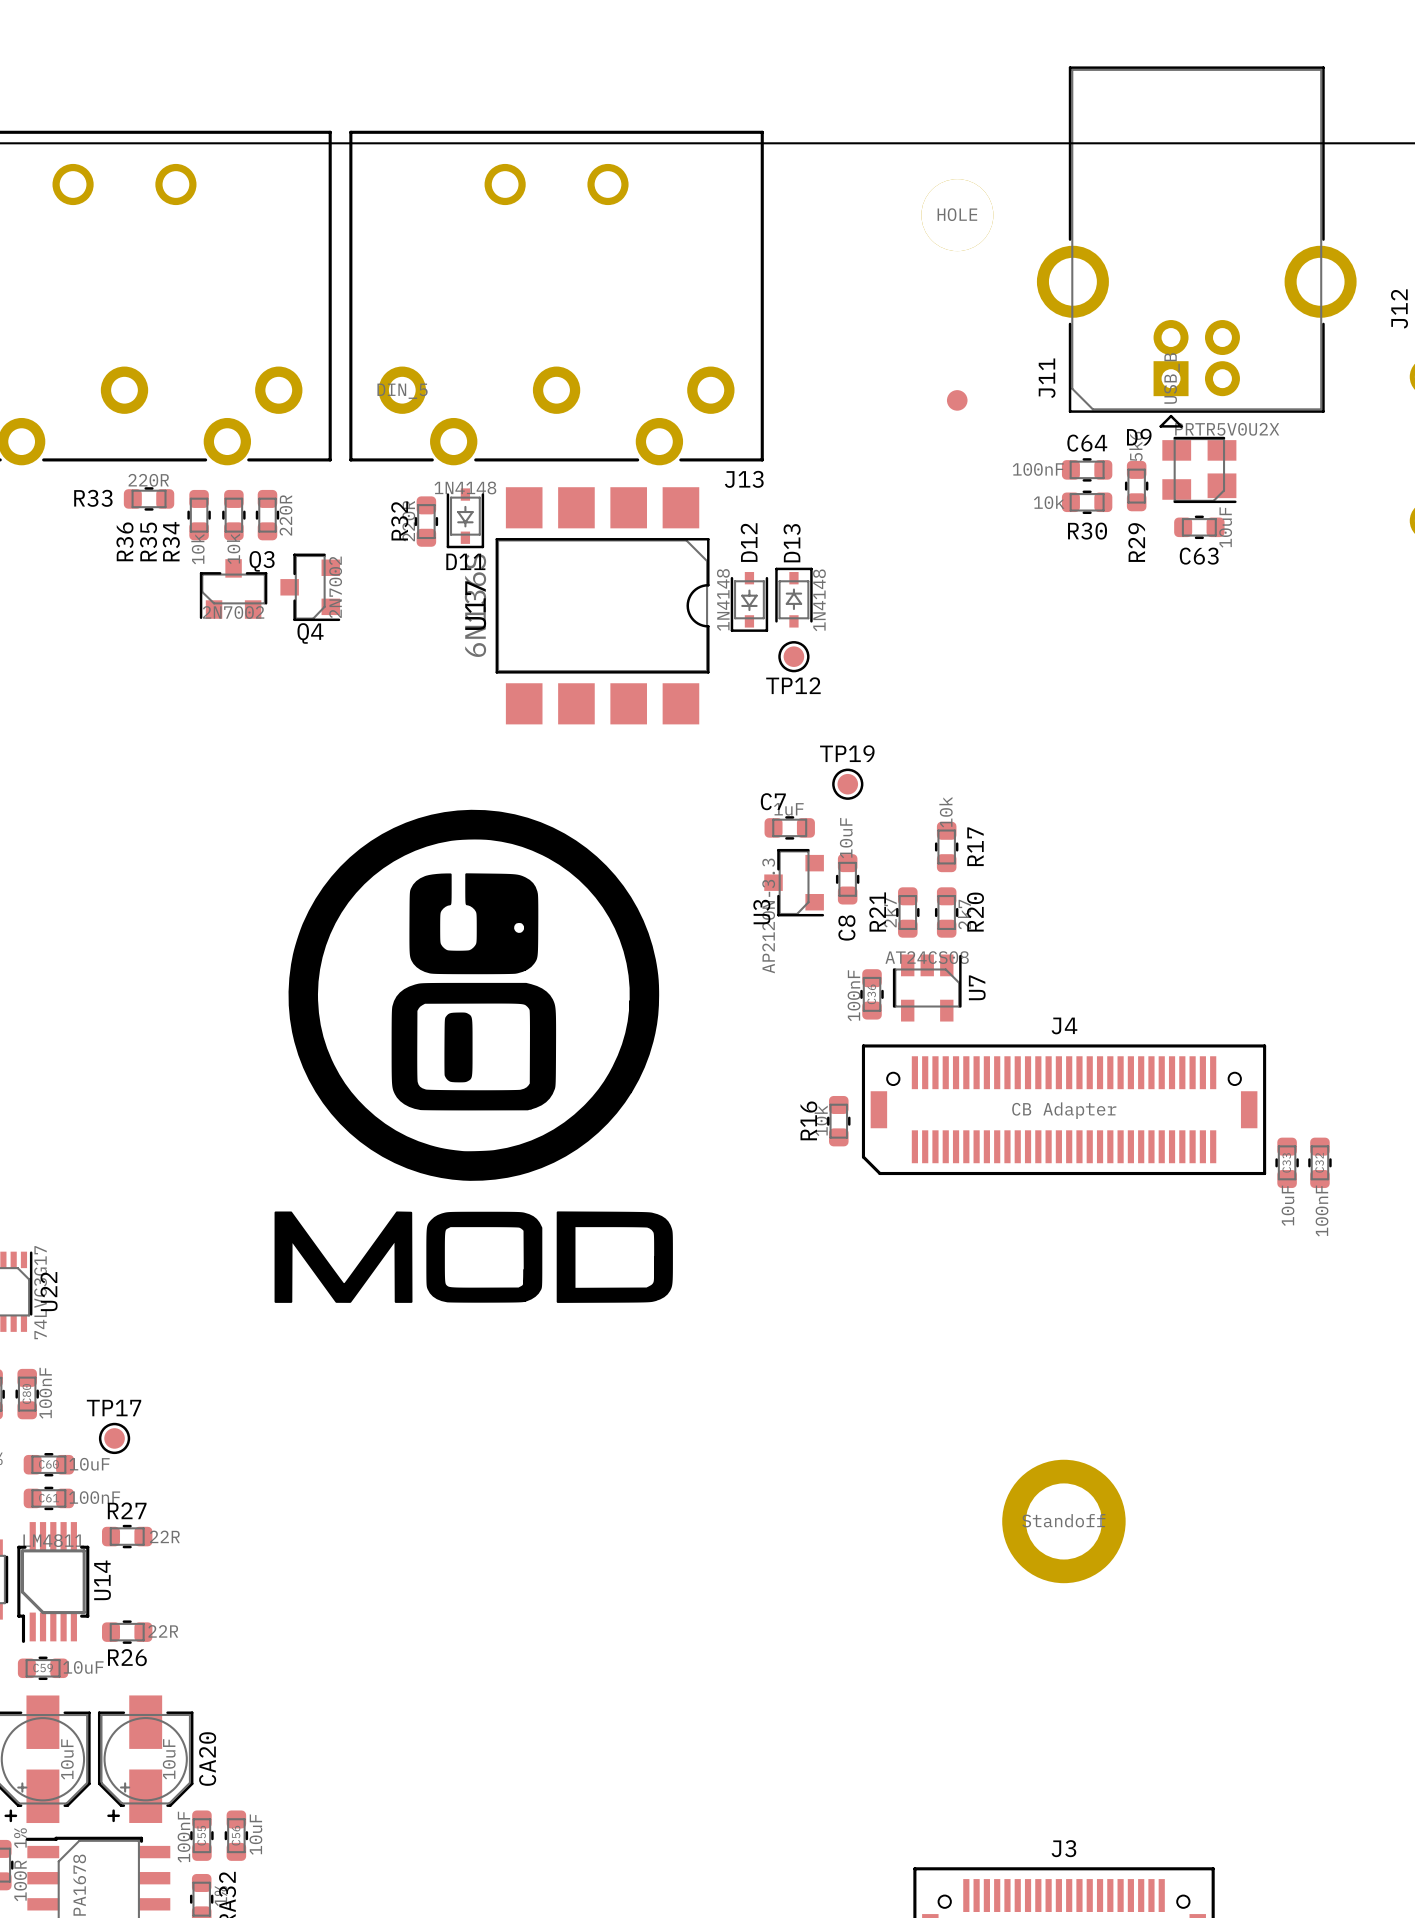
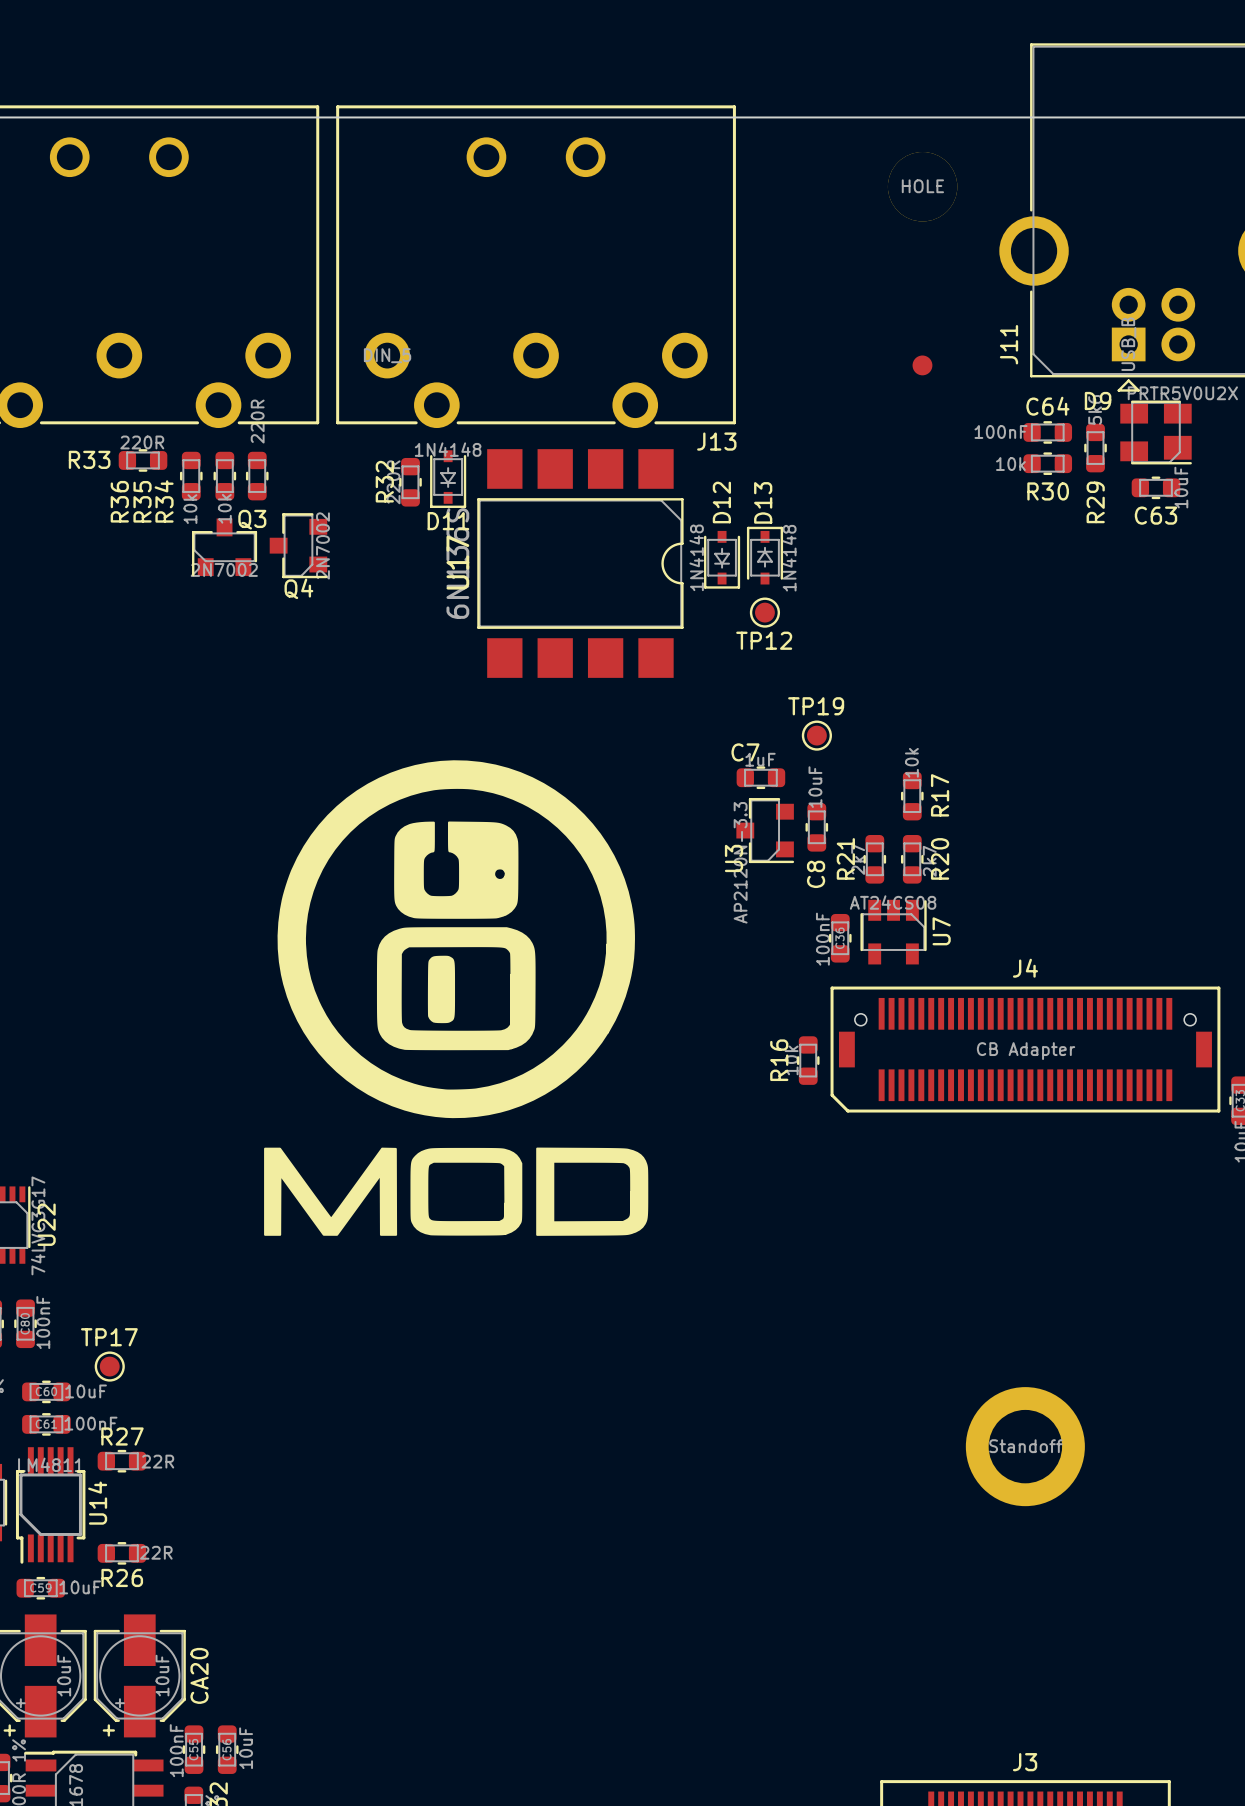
R34 value position: 220R (285, 515) -> 220R (257, 421)

